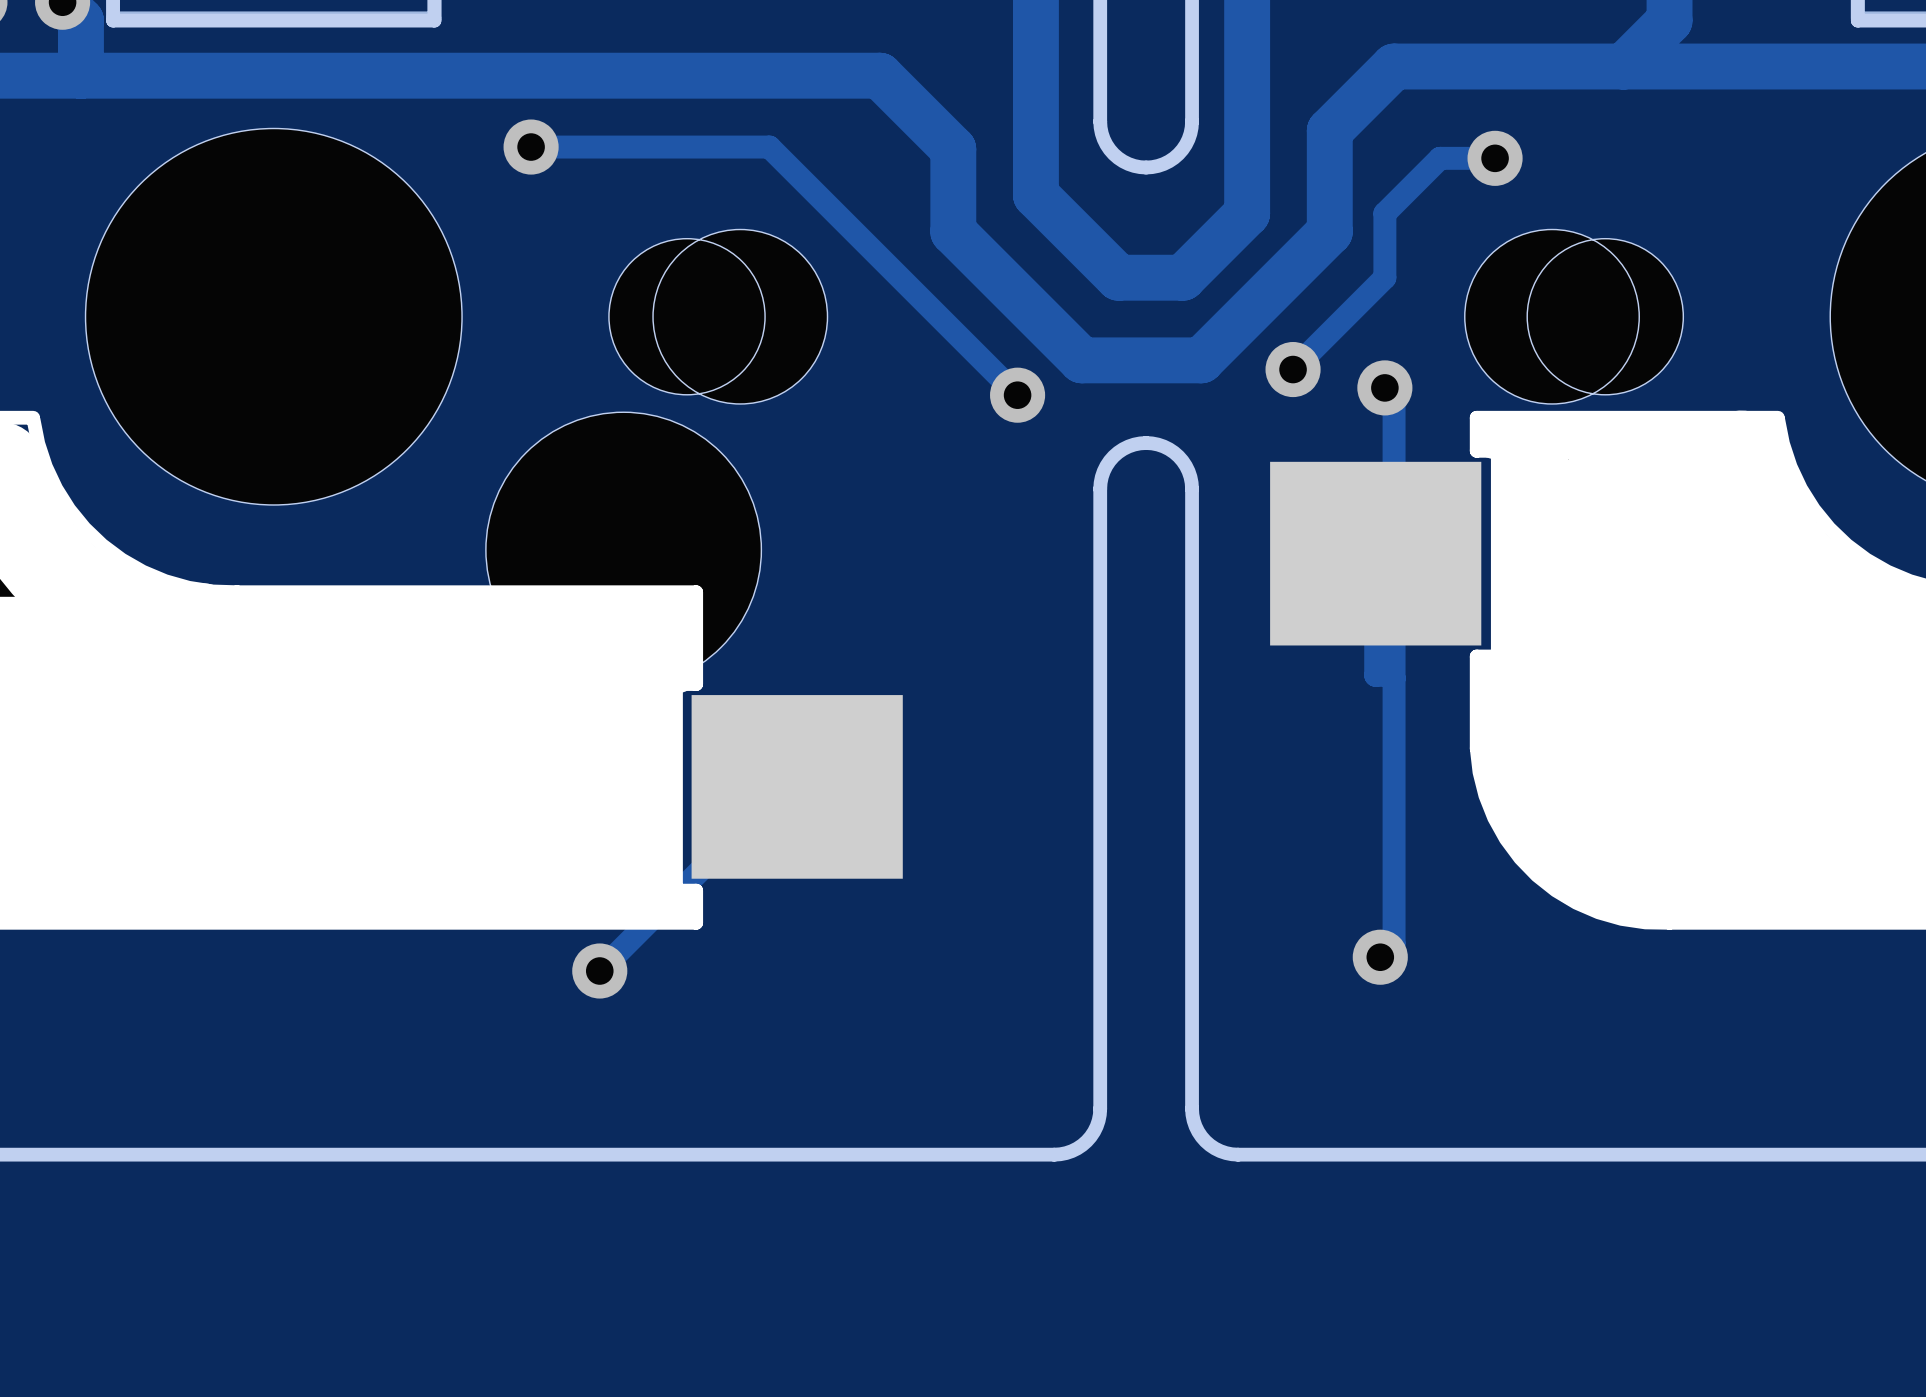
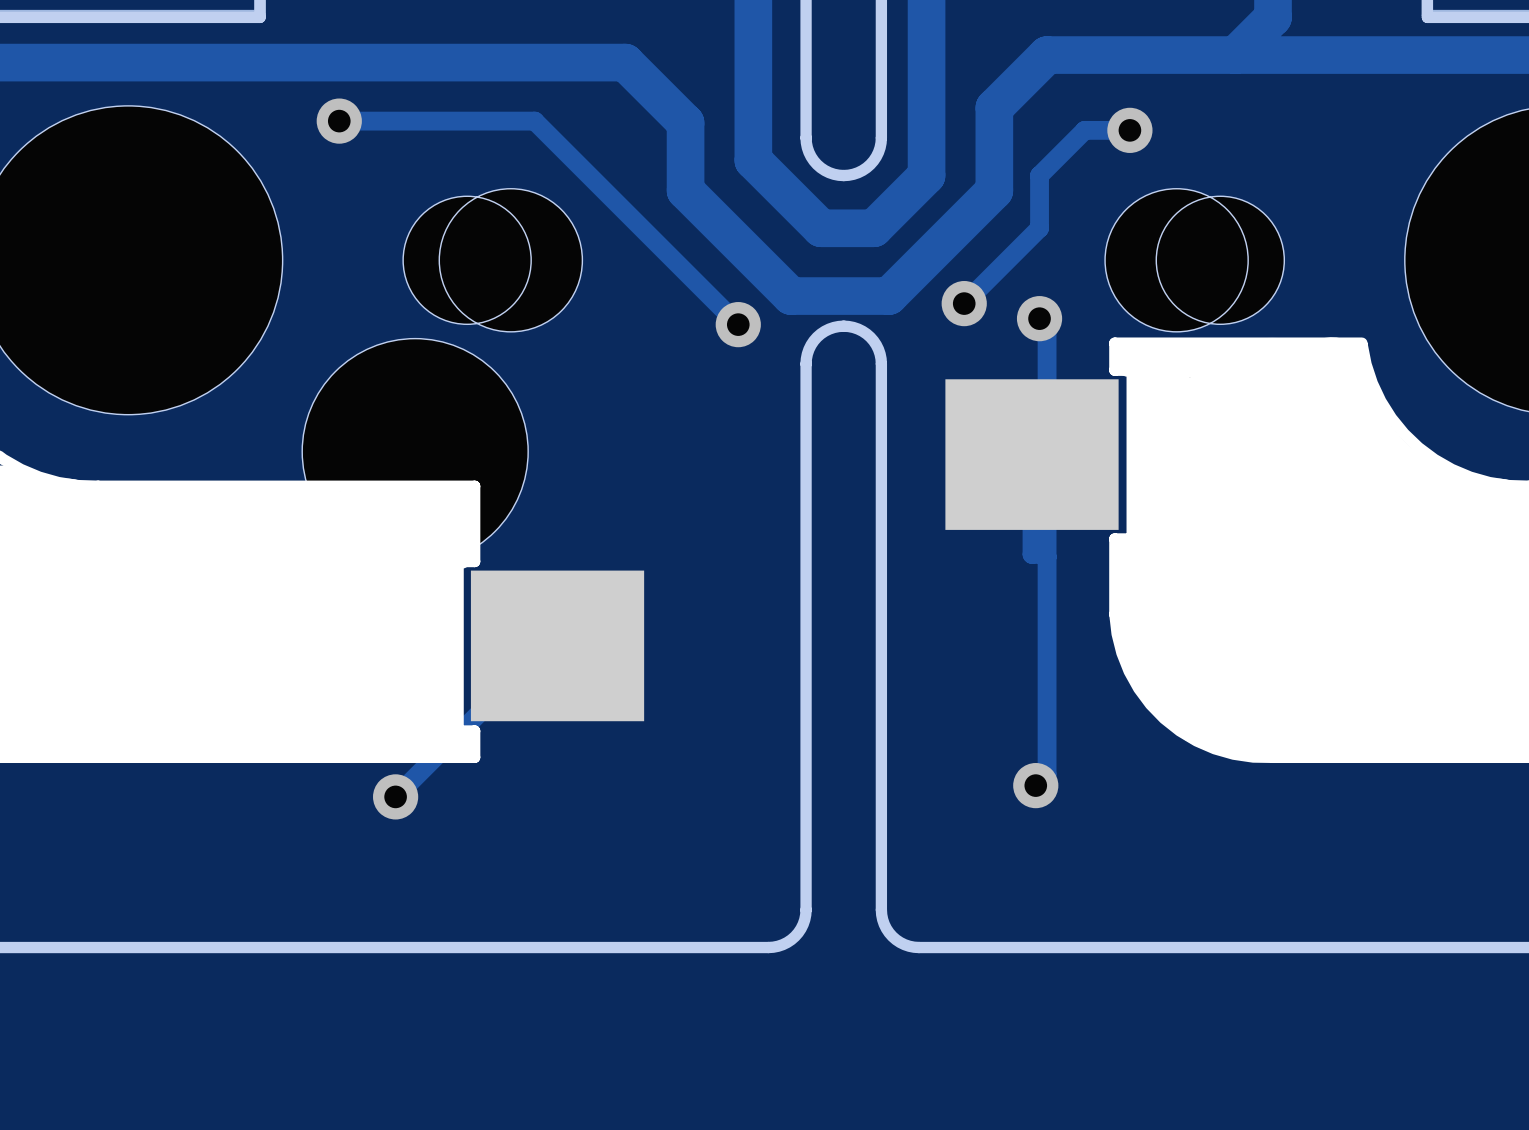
board edge: (1100, 121) (1103, 139) (1113, 154) (1128, 164) (1146, 167) (1163, 164) (1178, 154) (1188, 139) (1192, 121) -> (806, 100) (806, 142) (811, 156) (824, 170) (843, 175) (862, 170) (876, 156) (881, 142) (881, 100)
board edge: (1100, 488) (1103, 471) (1113, 456) (1128, 446) (1146, 443) (1163, 446) (1178, 456) (1188, 471) (1192, 488) -> (806, 401) (806, 358) (811, 345) (824, 331) (843, 326) (862, 331) (876, 345) (881, 358) (881, 401)

